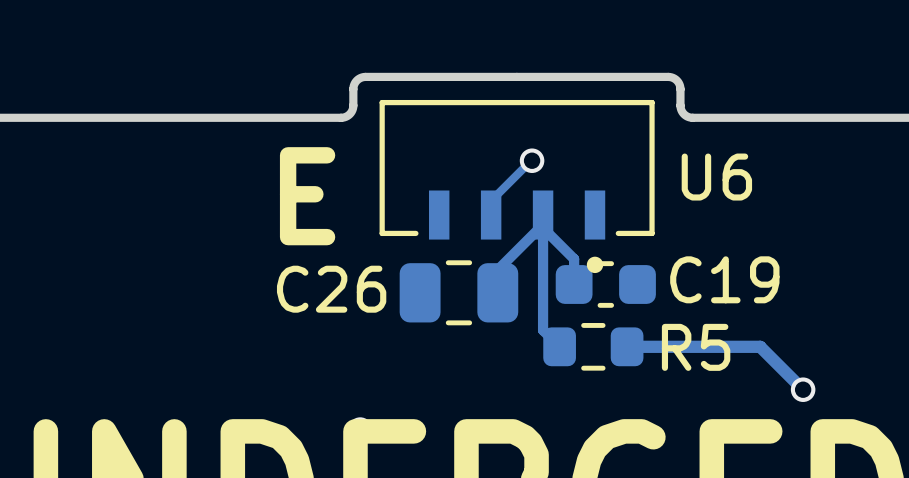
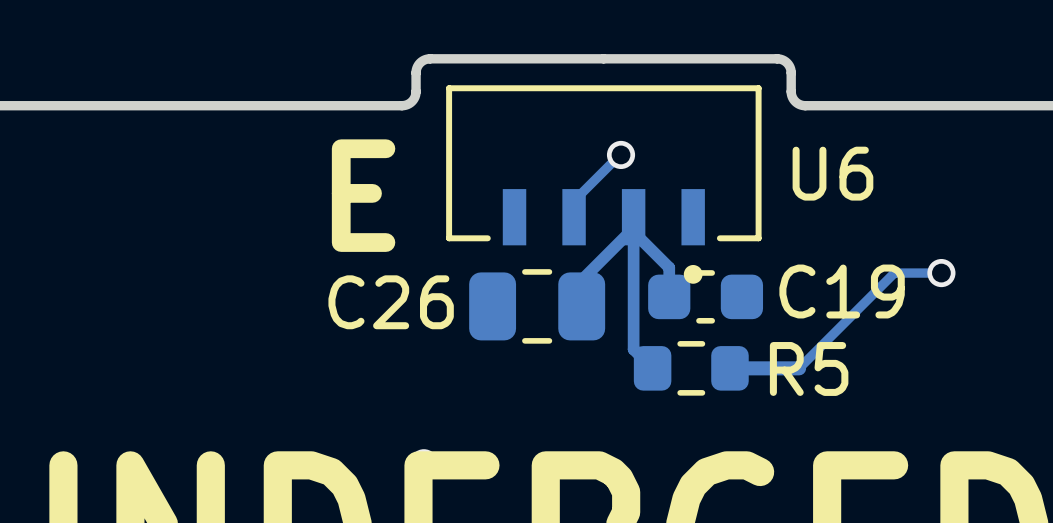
track: (687, 346) (760, 346) (803, 389) -> (799, 368) (894, 273) (941, 273)
via position: (803, 389) -> (941, 273)

